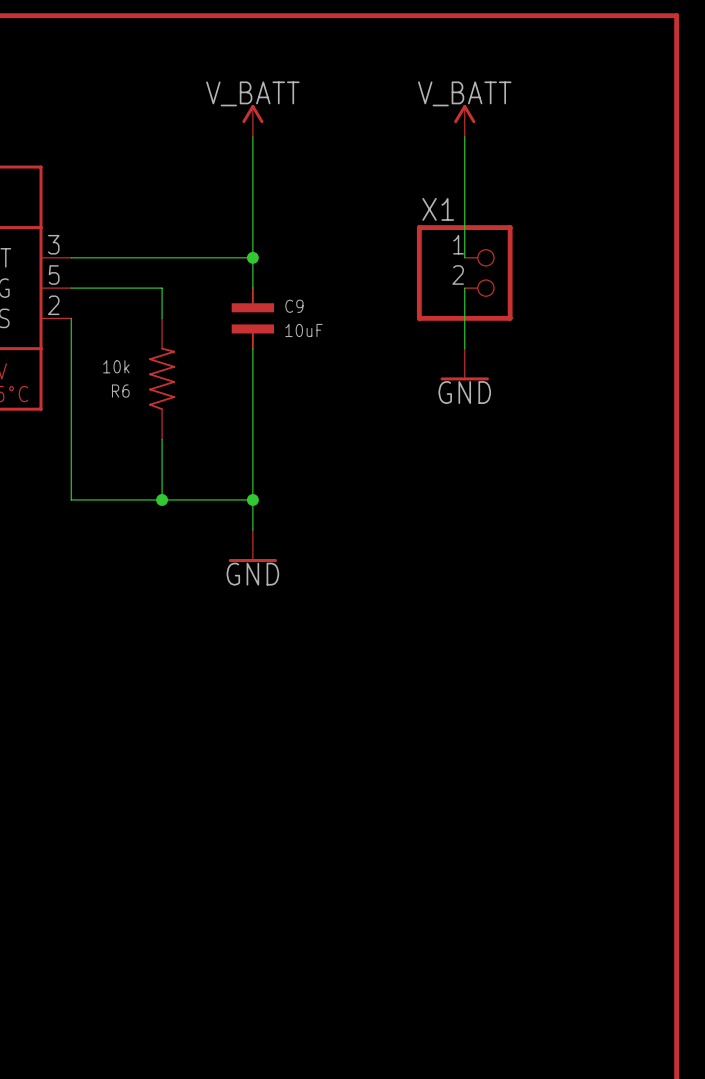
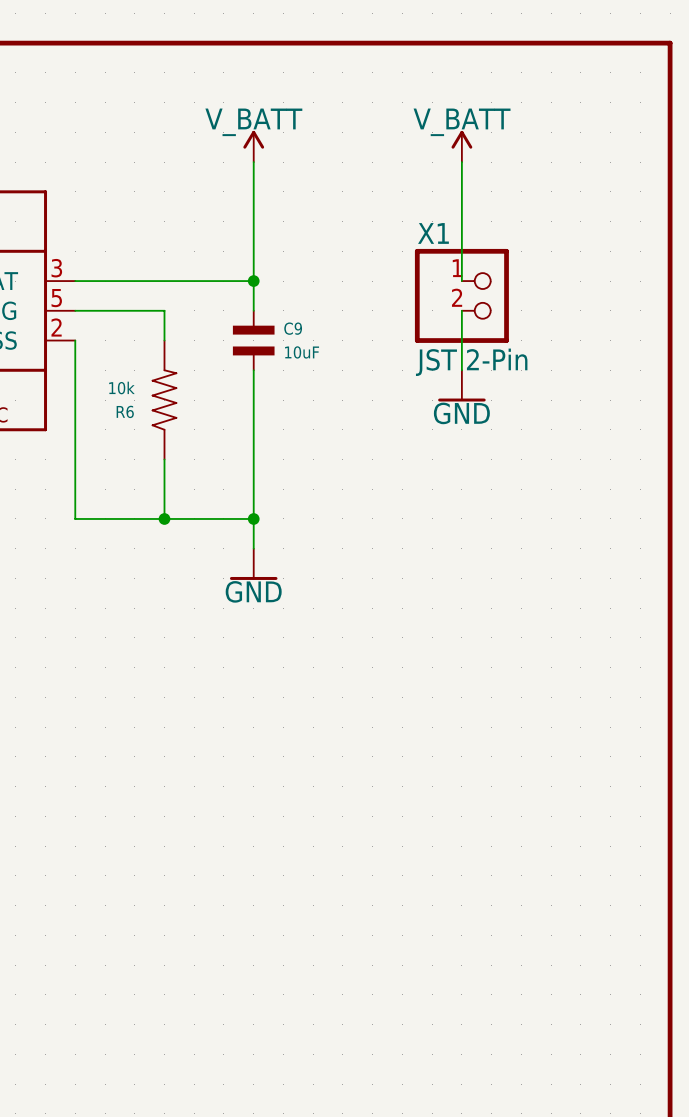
X1 value: none -> JST 2-Pin (471, 362)

